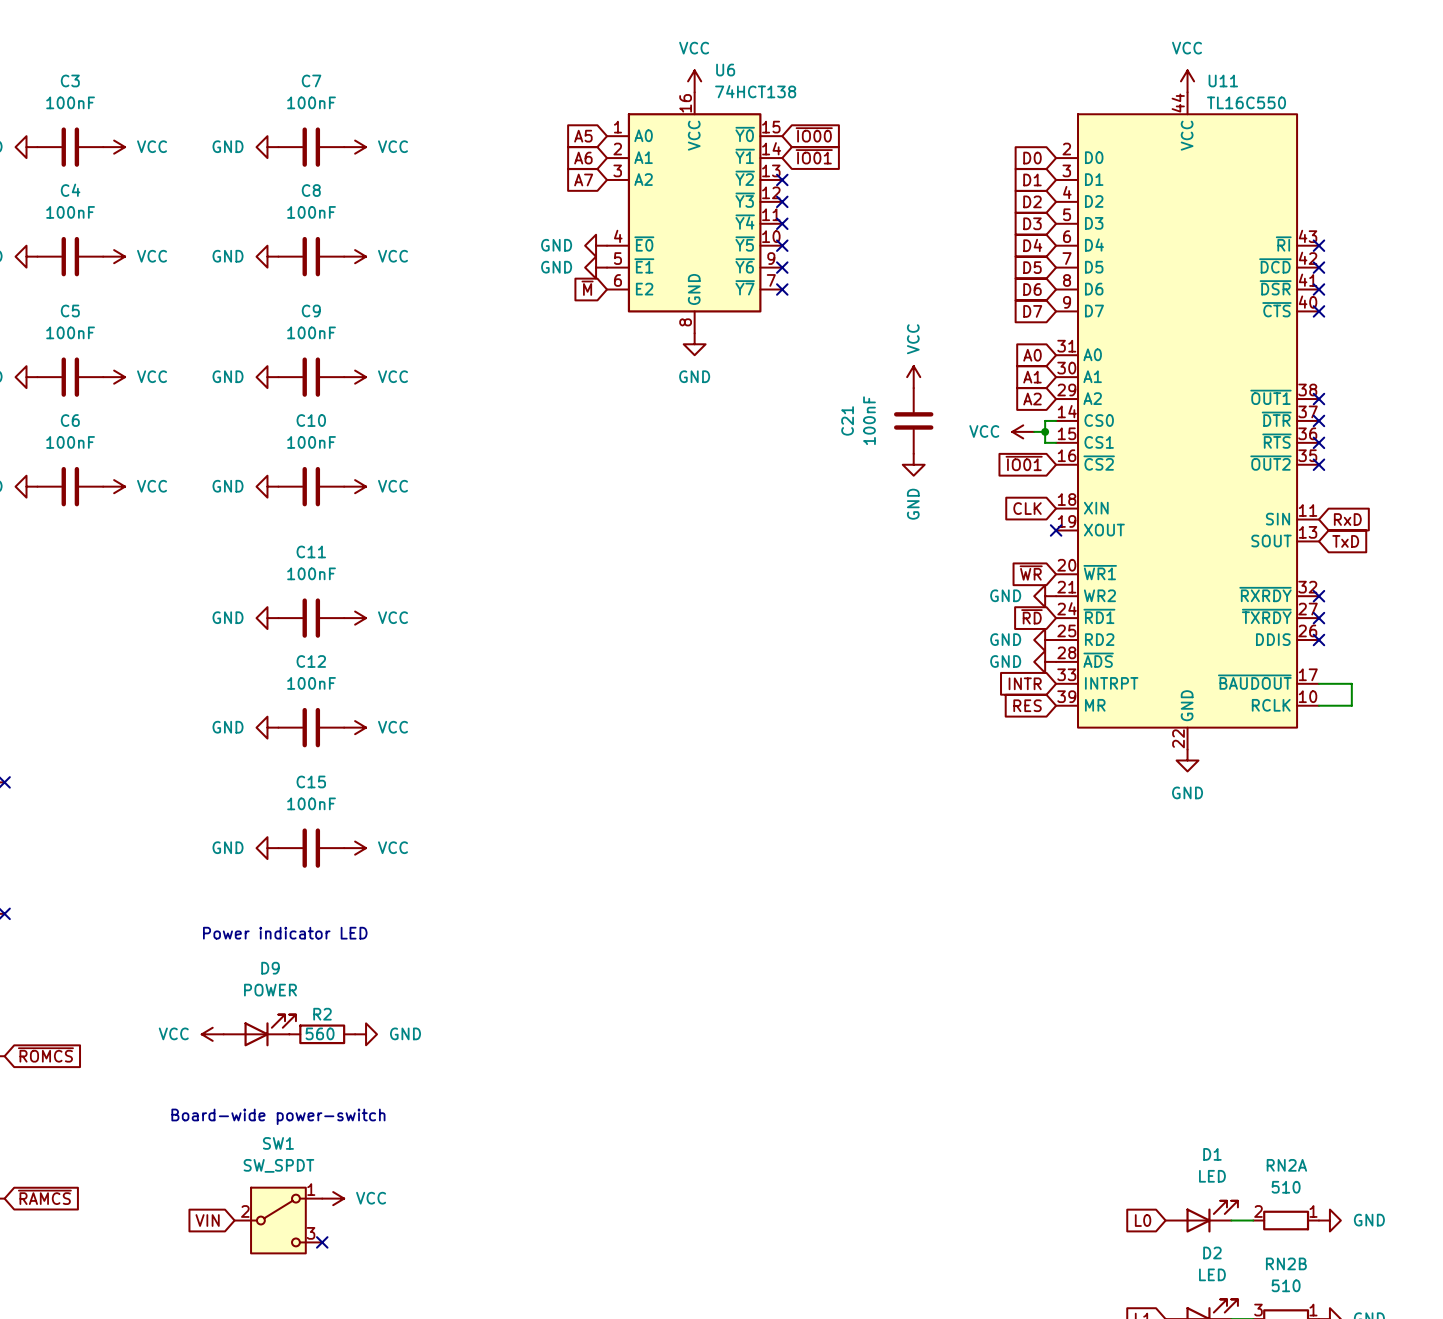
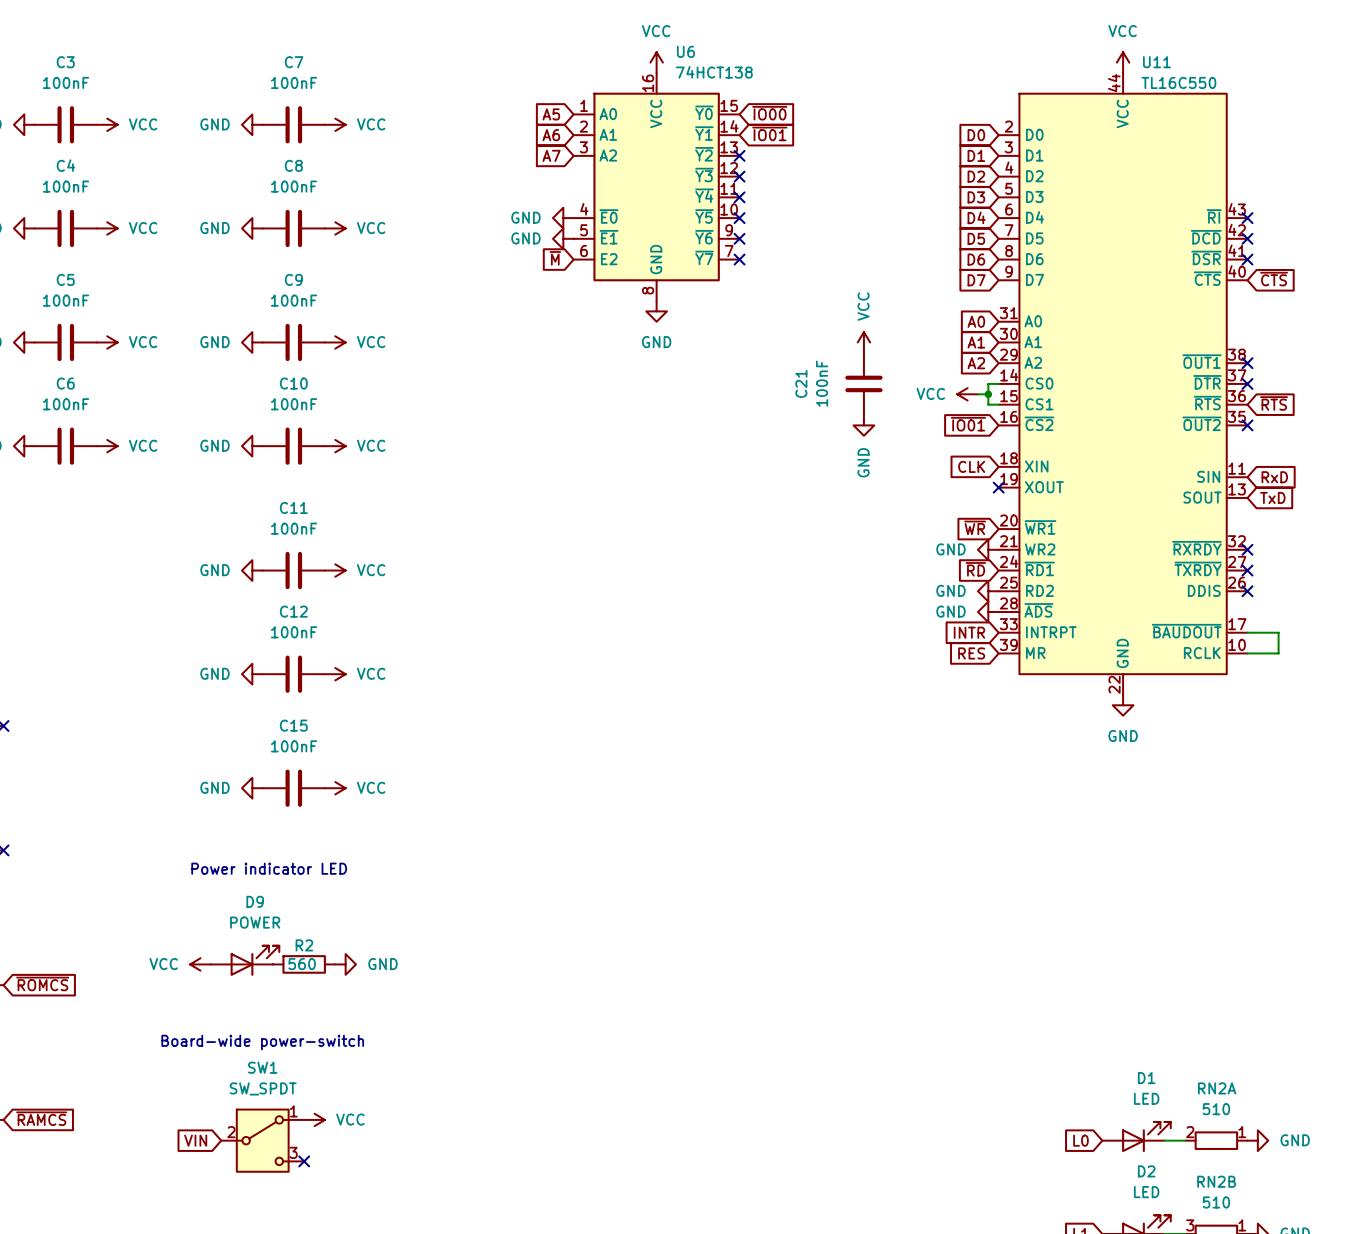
global label: none -> ~{CTS} (1274, 279)
no-connect mark: (1318, 311) -> none
global label: none -> ~{RTS} (1274, 403)
no-connect mark: (1318, 442) -> none

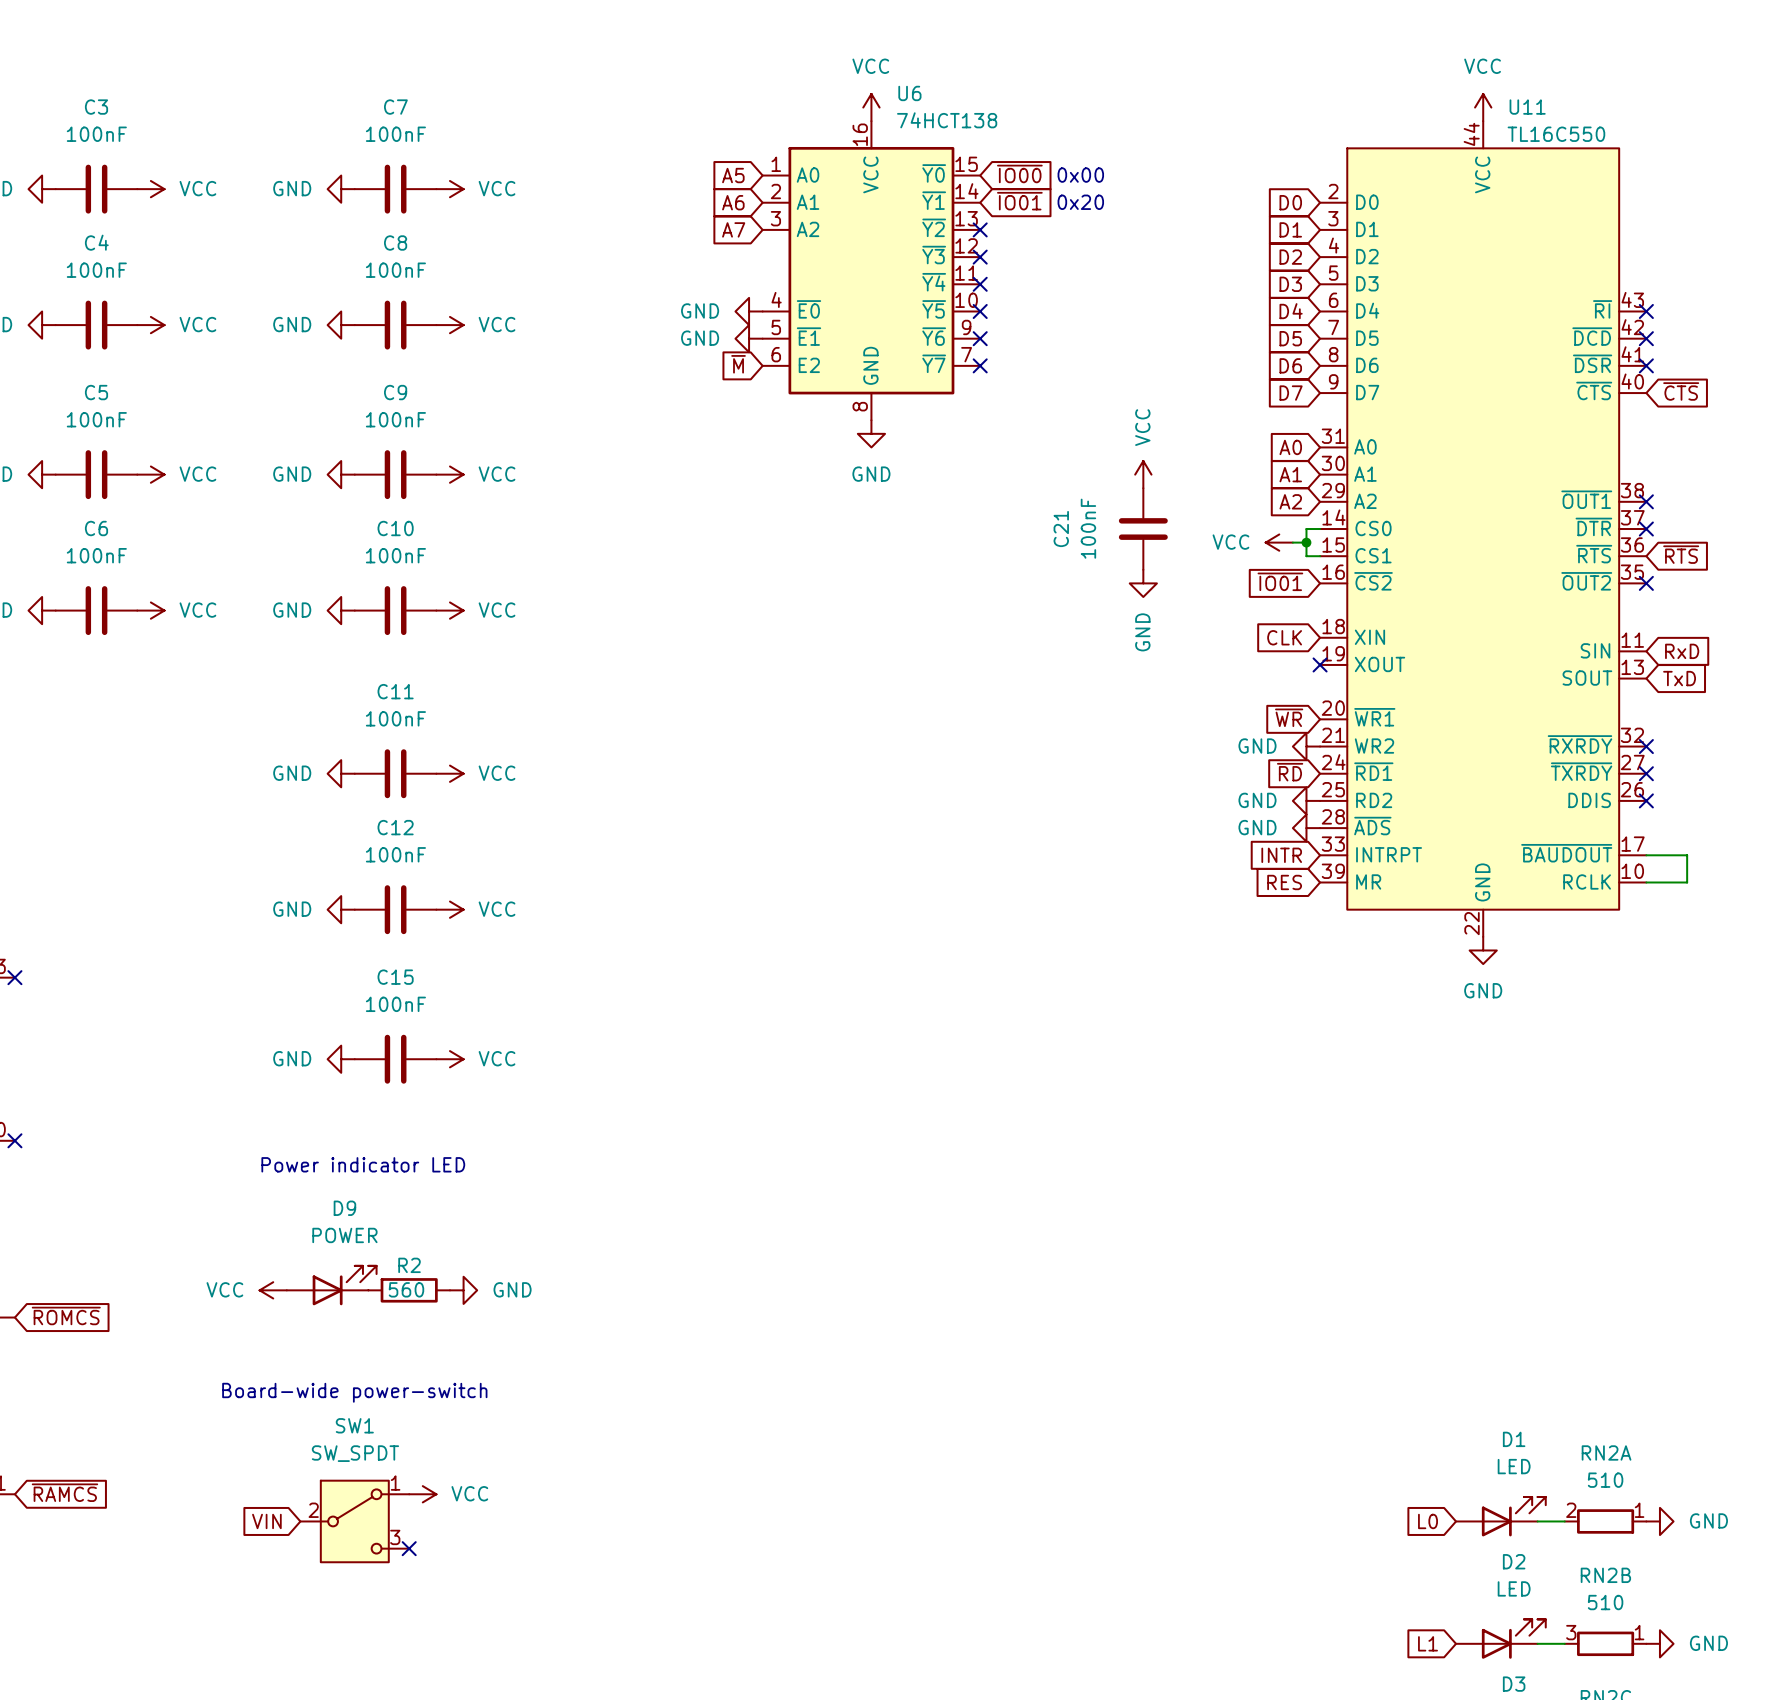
text: none -> 0x00 (1080, 175)
text: none -> 0x20 (1080, 202)

